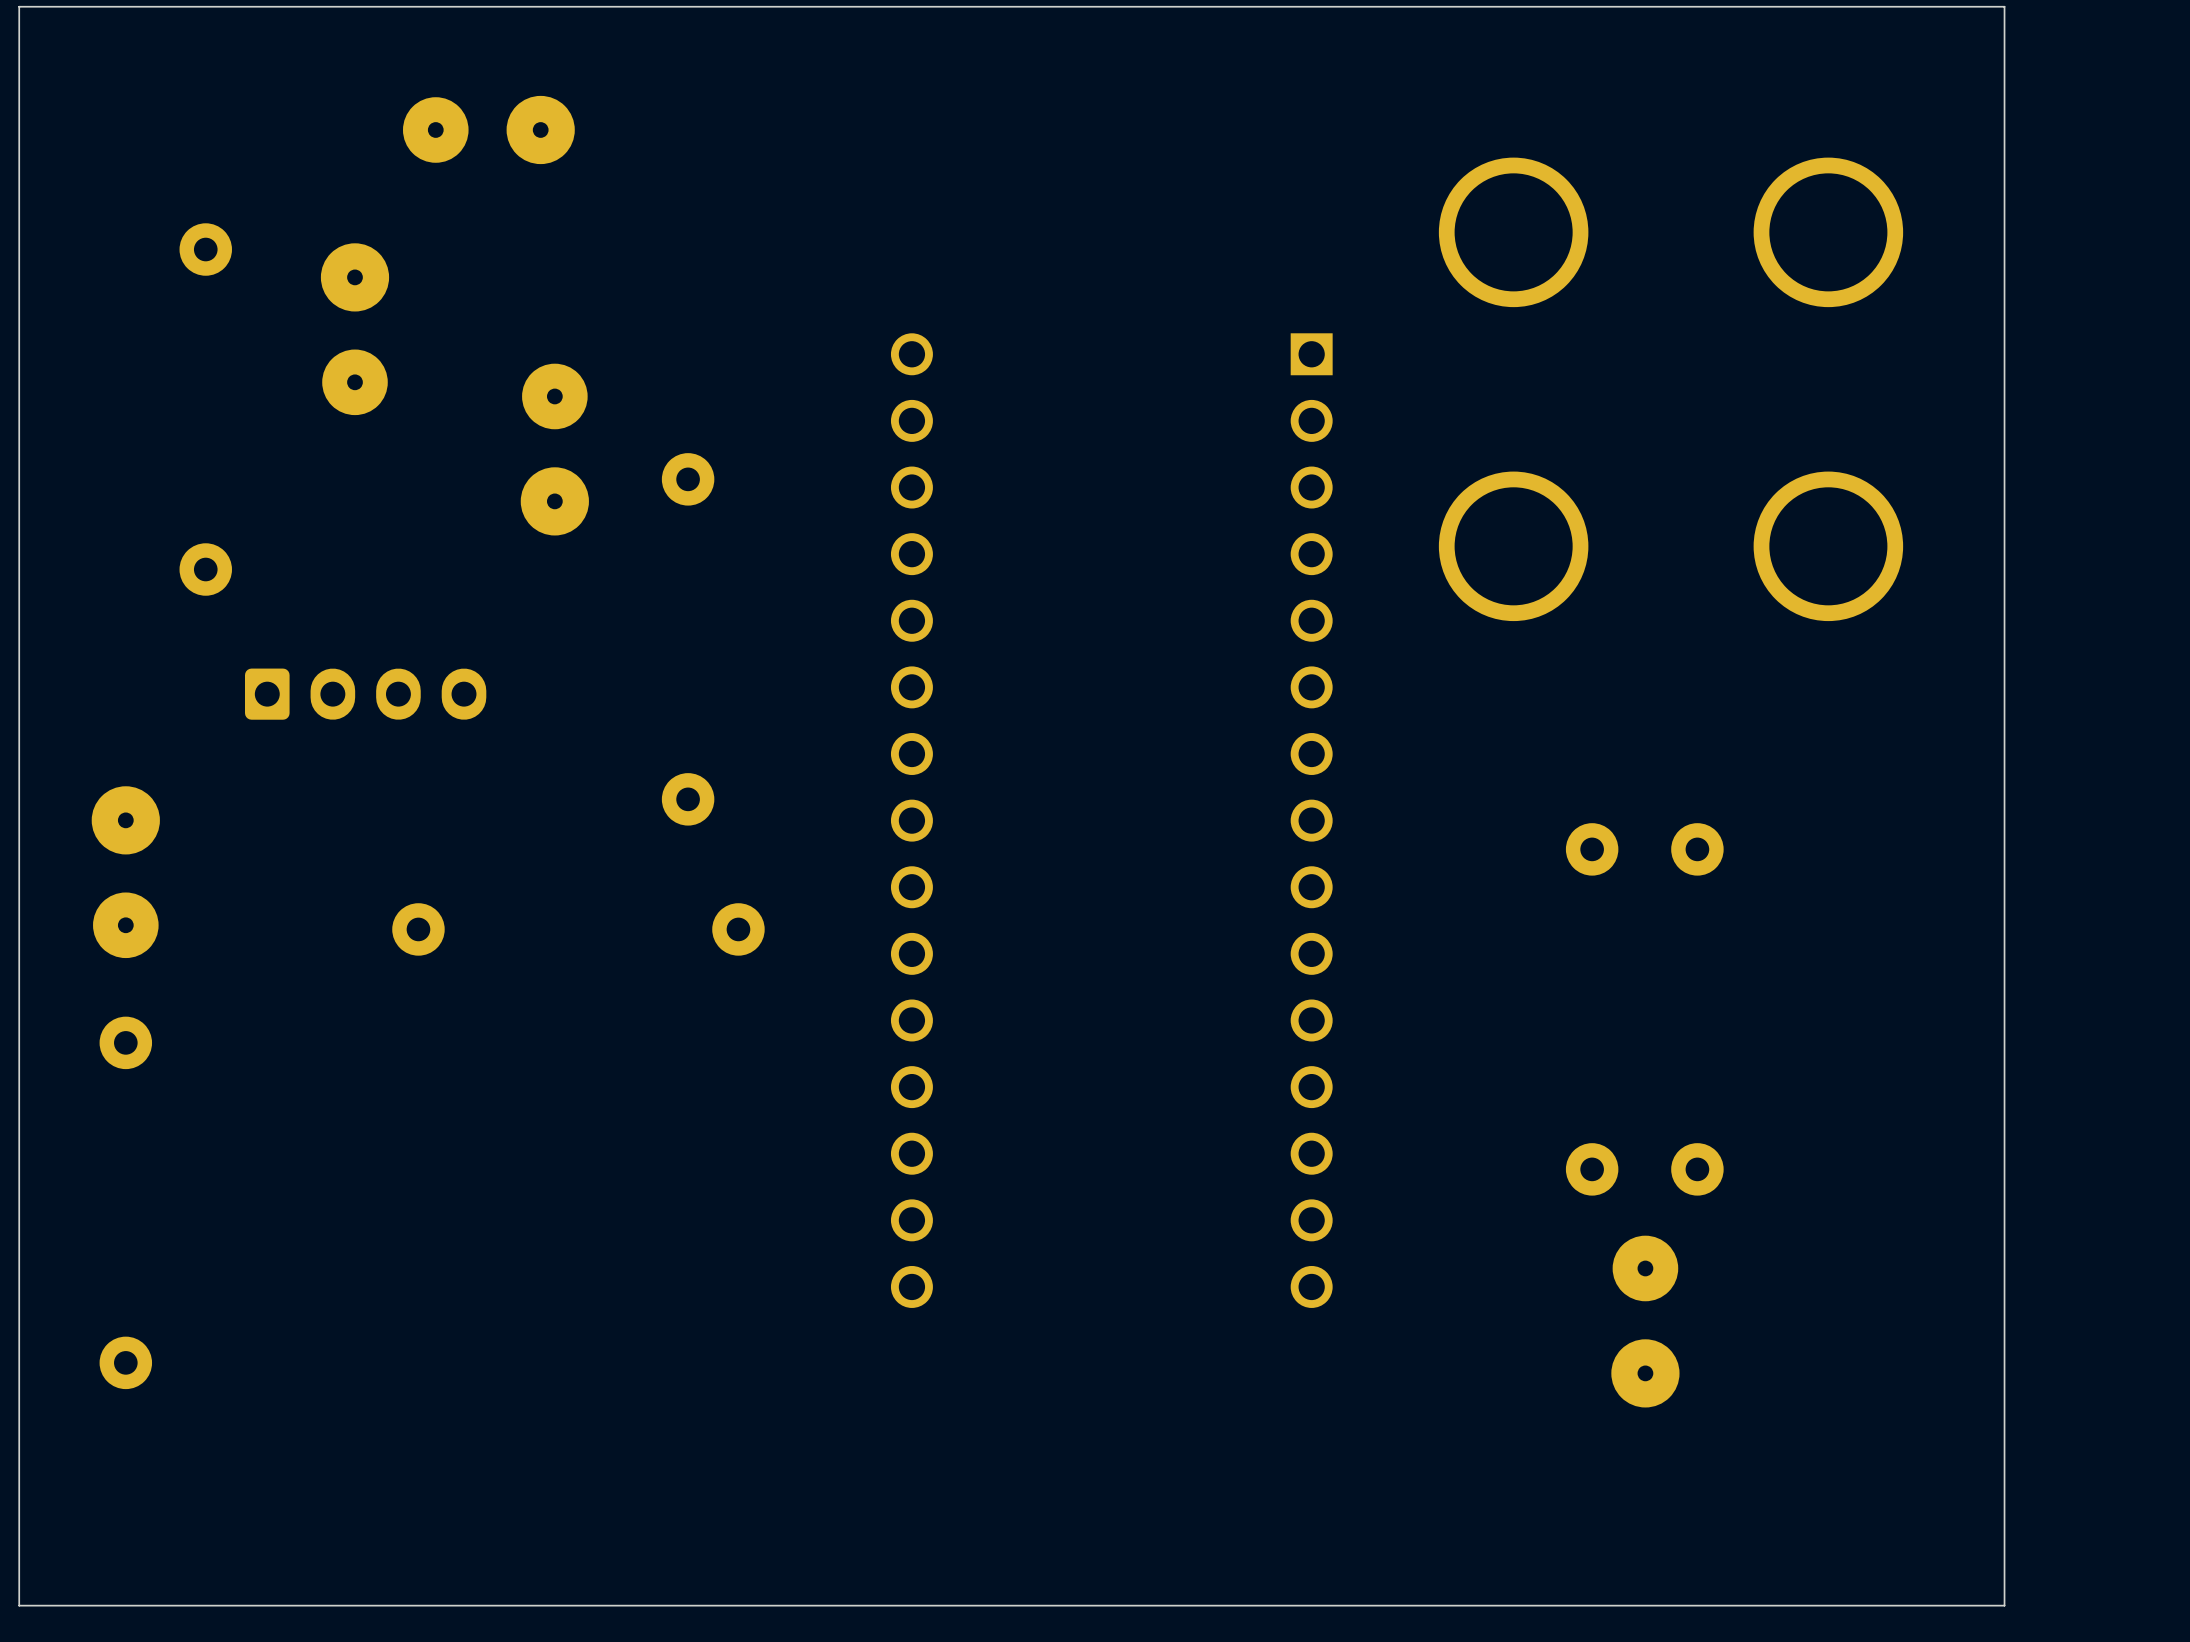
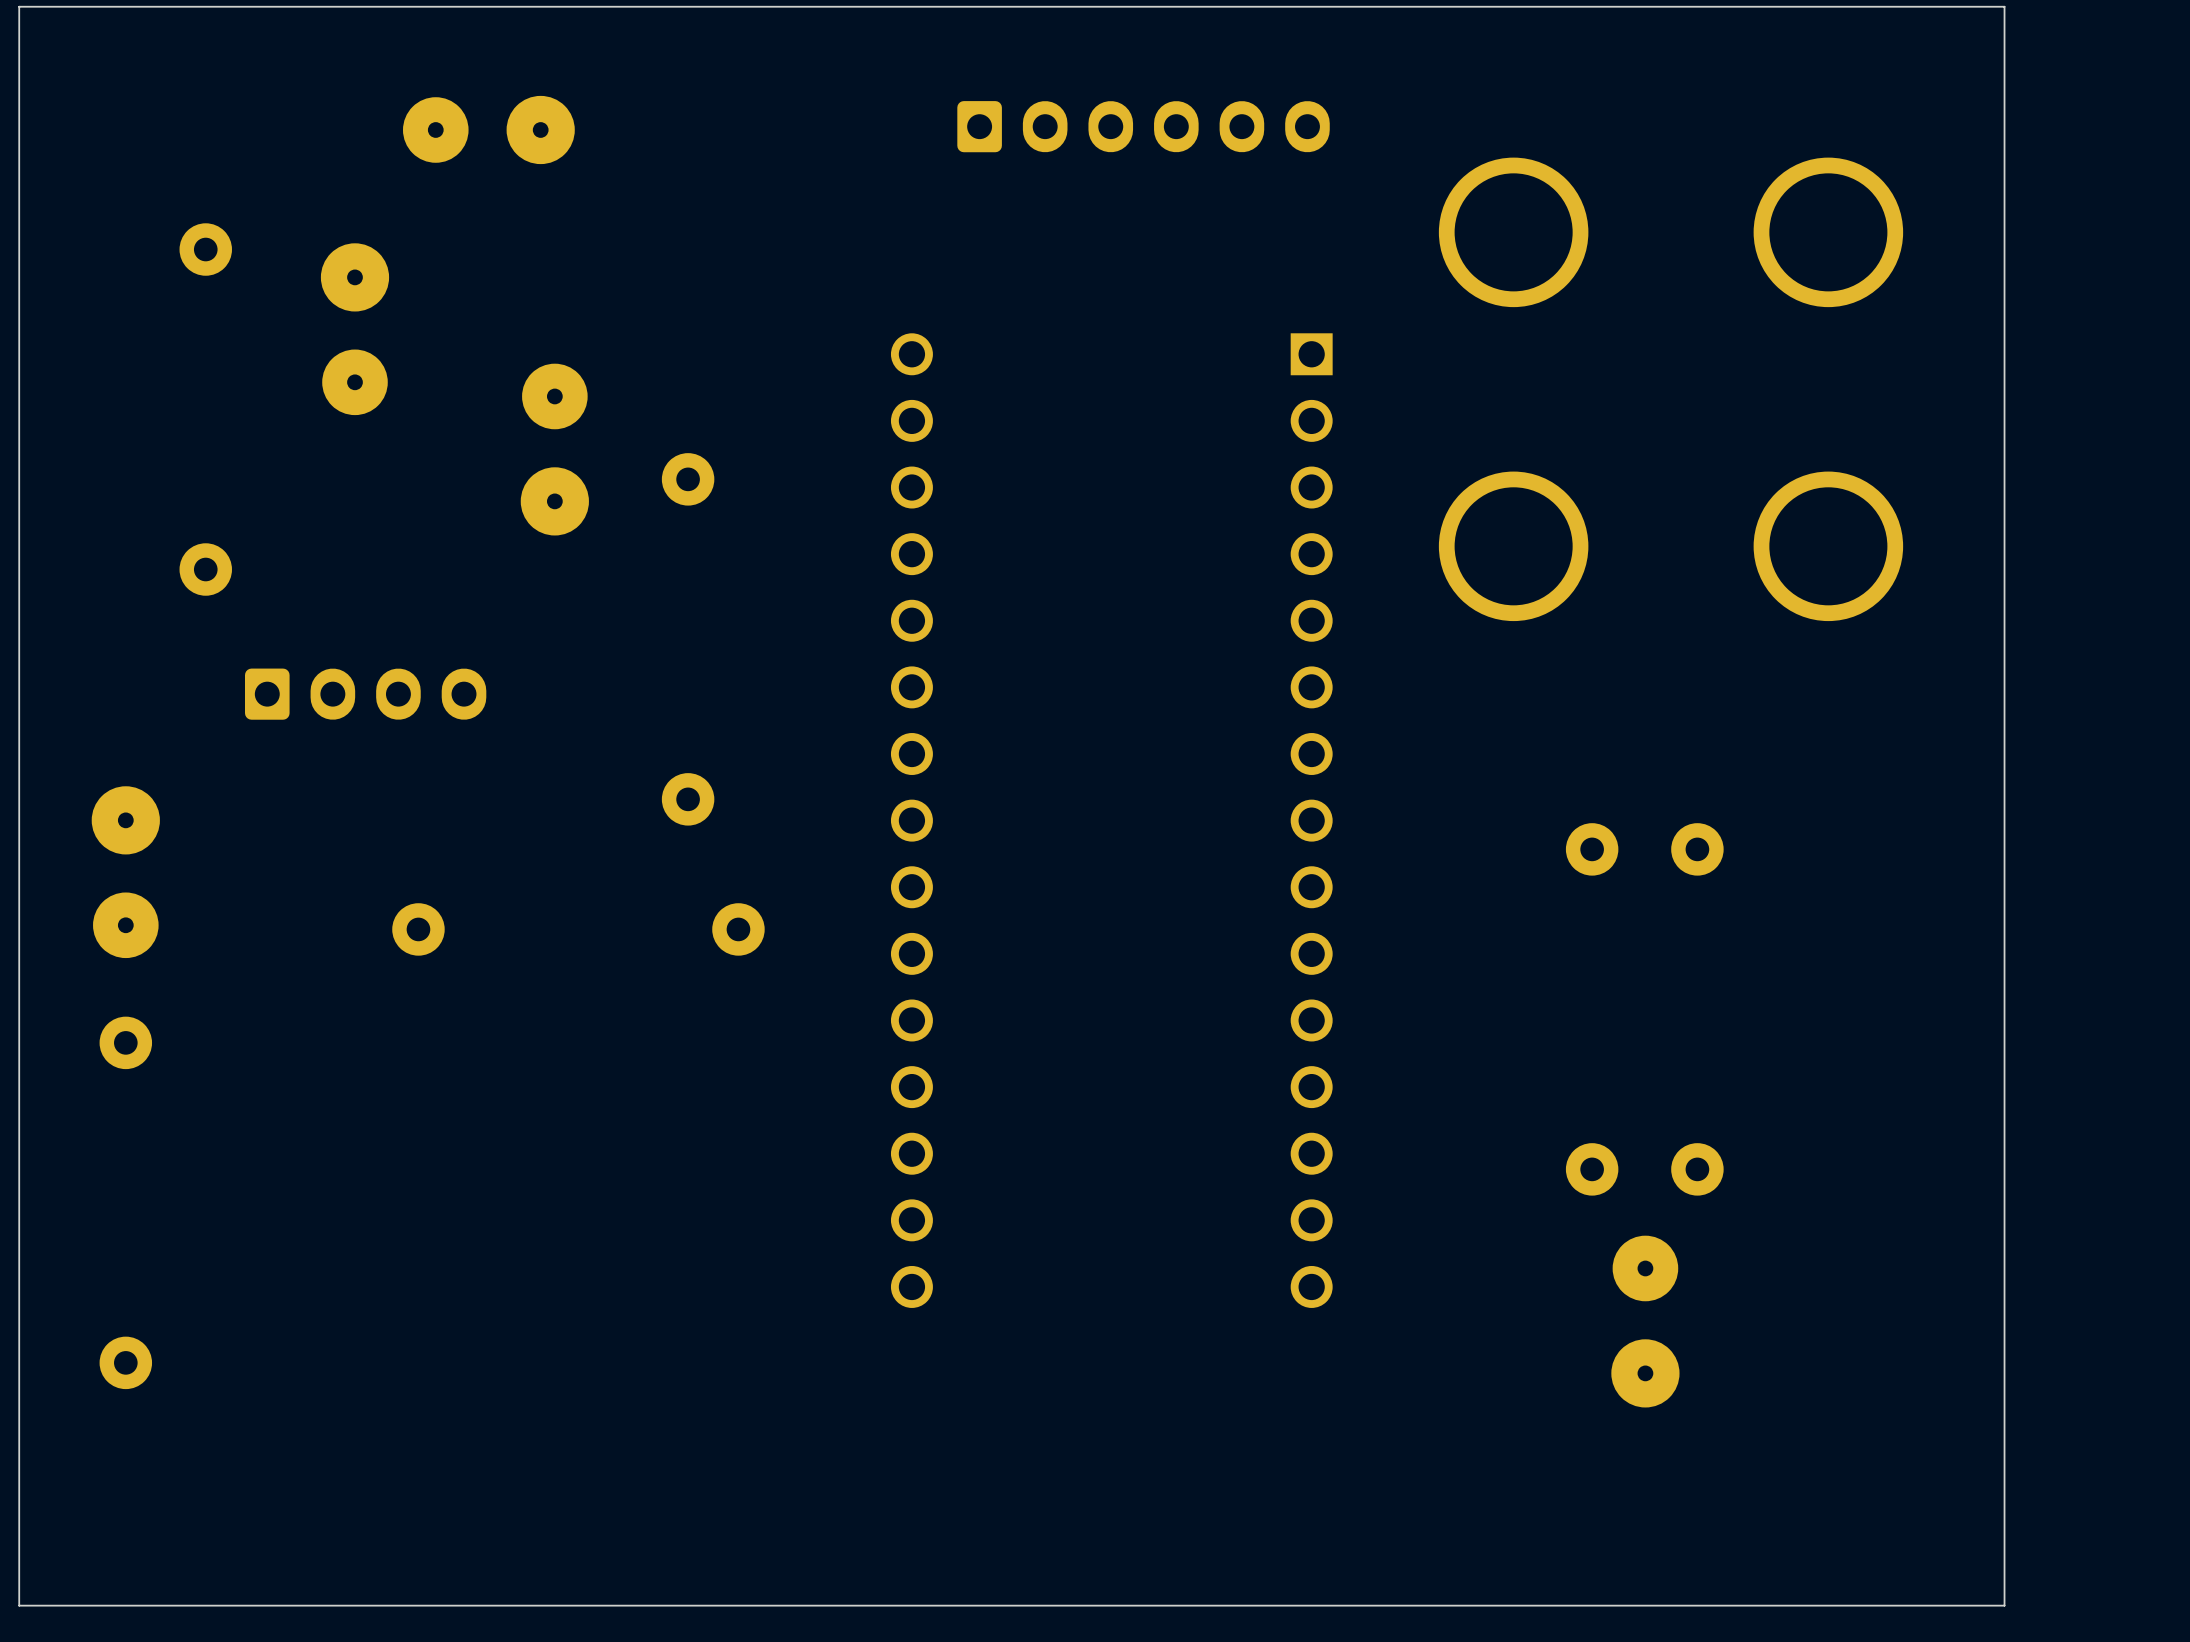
part: none -> (1143, 126)

